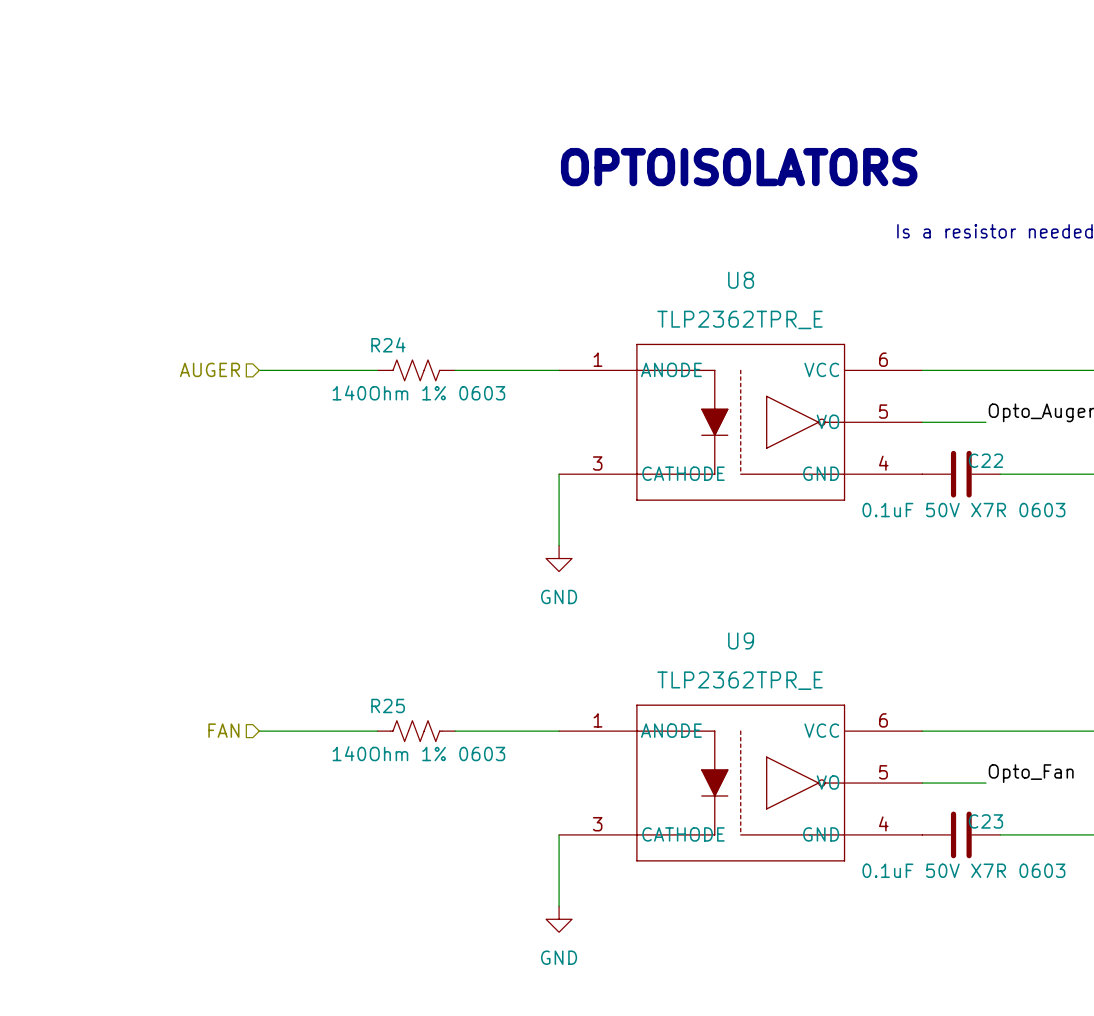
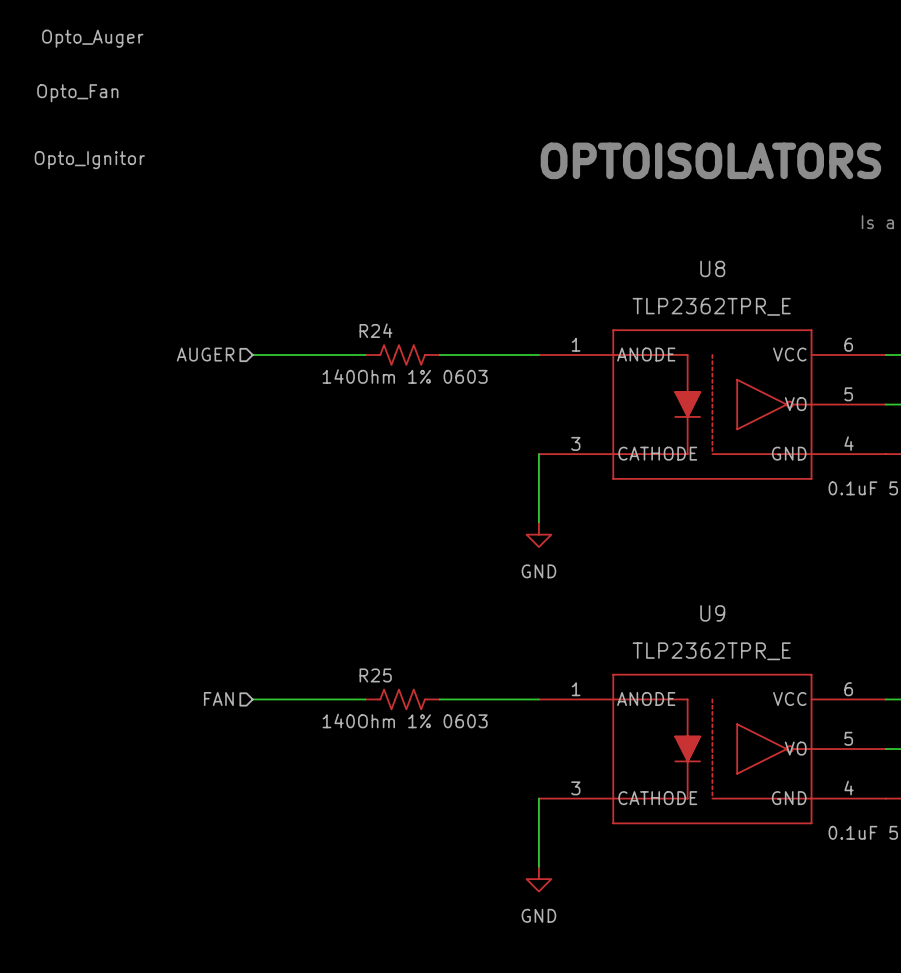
label: none -> Opto_Auger (92, 38)
label: none -> Opto_Fan (77, 93)
label: none -> Opto_Ignitor (89, 160)

